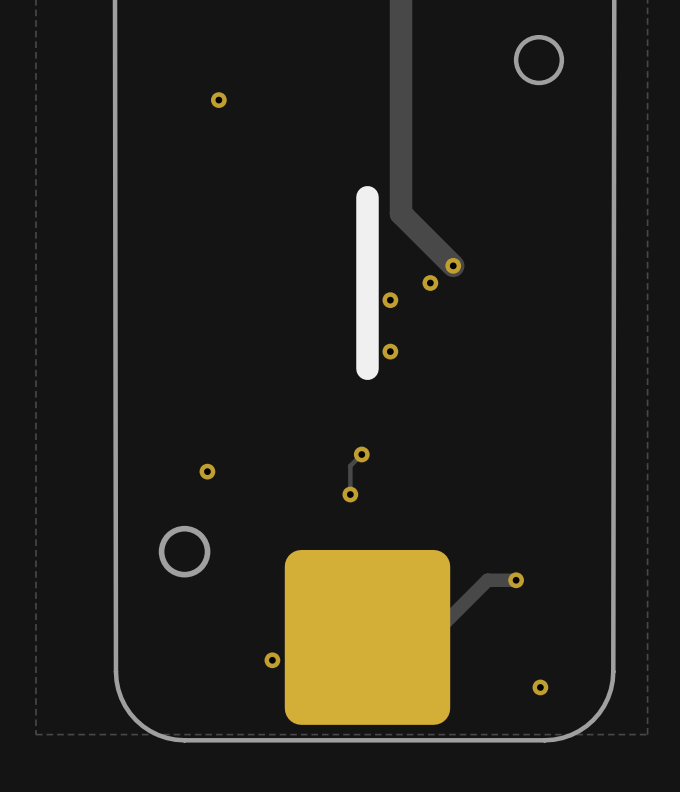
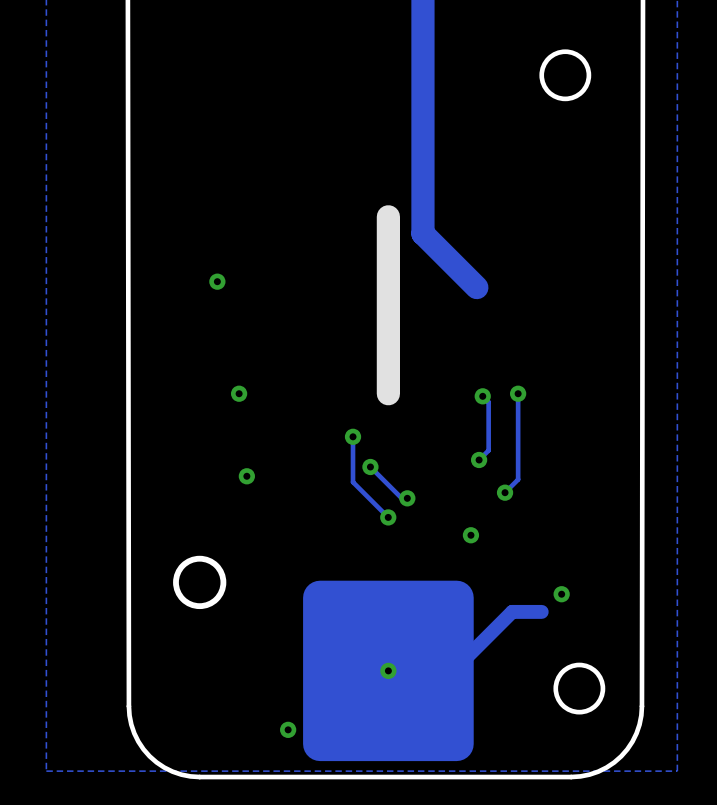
via: (218, 100) -> none
via: none -> (217, 281)
via: (453, 265) -> none
via: (430, 283) -> none
via: (390, 300) -> none
via: (390, 351) -> none
via: none -> (239, 393)
track: none -> (518, 393) (518, 479) (505, 492)
via: none -> (518, 393)
track: none -> (482, 396) (488, 402) (488, 450) (479, 459)
via: none -> (482, 396)
track: none -> (353, 436) (353, 482) (388, 517)
via: none -> (353, 436)
via: none -> (479, 459)
track: none -> (370, 466) (401, 498) (407, 498)
track: (361, 454) (350, 465) (350, 494) -> none
via position: (361, 454) -> (370, 466)
via: none -> (505, 492)
via: none -> (407, 498)
via position: (207, 471) -> (246, 476)
via: none -> (388, 517)
via: (350, 494) -> none
via: none -> (470, 535)
via position: (516, 580) -> (561, 594)
round board edge: none -> [553, 662, 606, 715]
via: none -> (388, 670)
via position: (272, 660) -> (288, 729)
via: (540, 687) -> none

